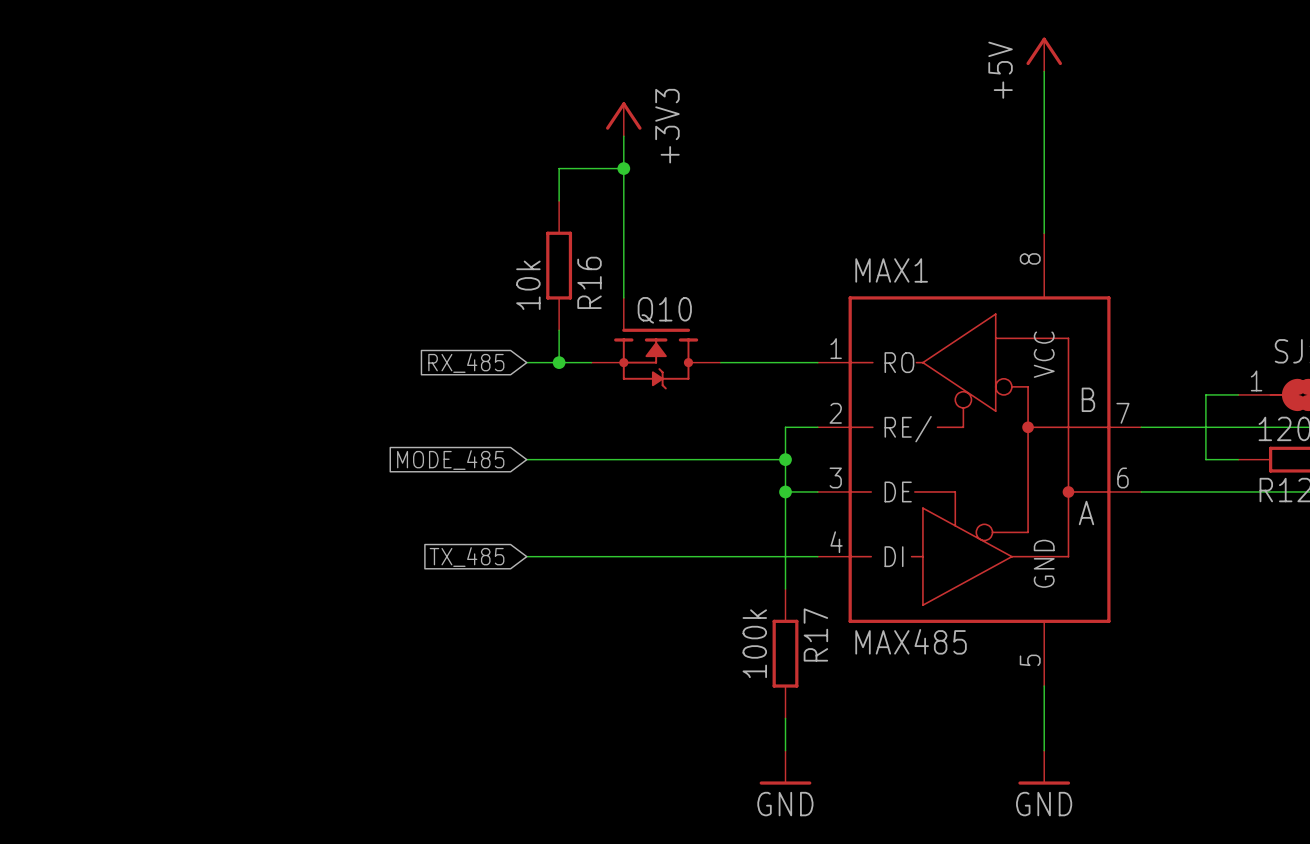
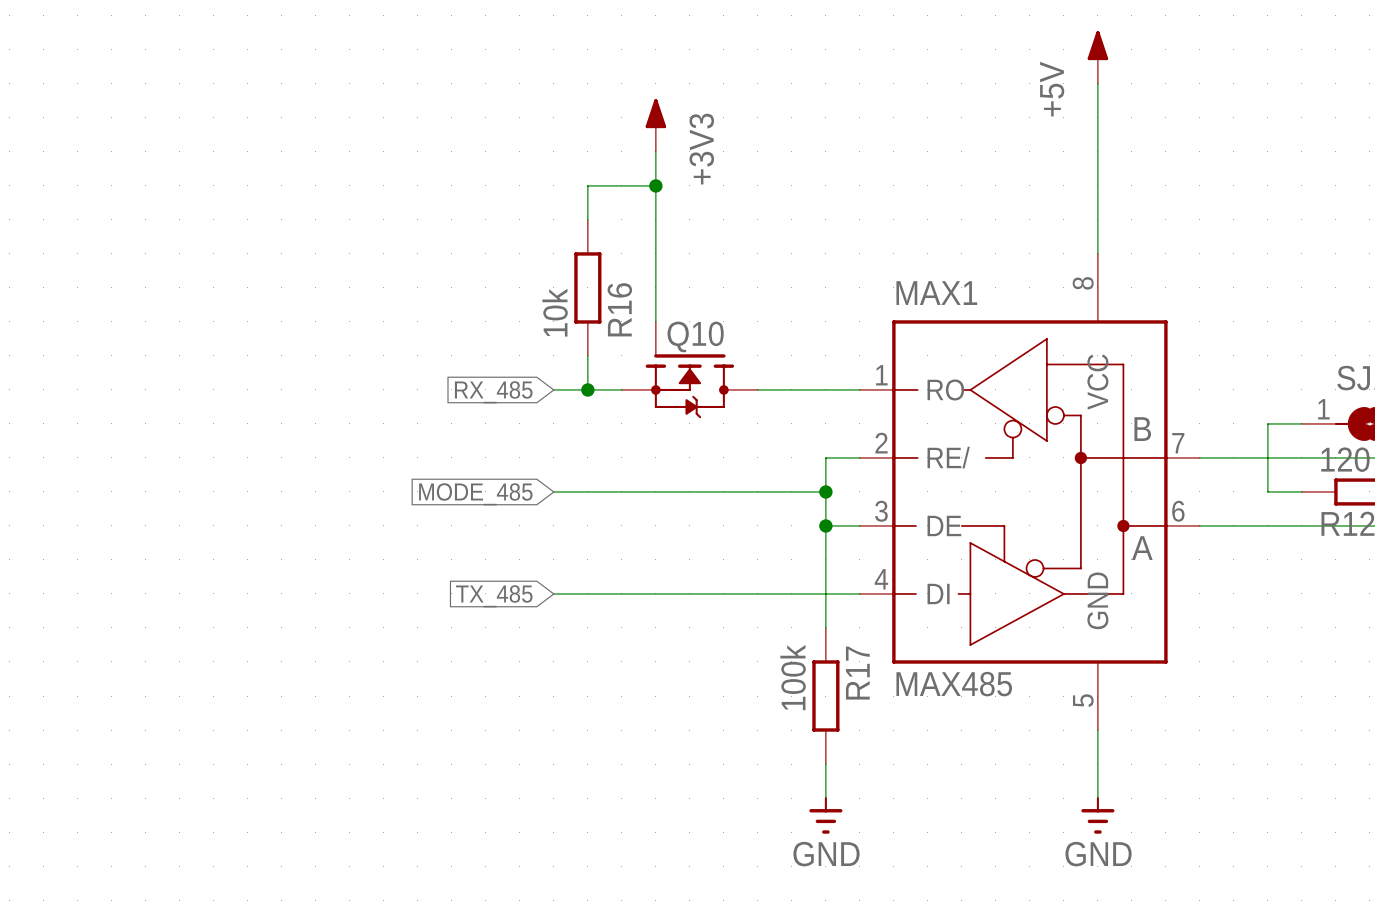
power symbol shape: [1026, 37, 1063, 72] -> [1087, 31, 1109, 84]
power symbol shape: [606, 102, 642, 137] -> [645, 99, 667, 152]
power symbol shape: [759, 750, 812, 785] -> [809, 796, 843, 834]
power symbol shape: [1018, 750, 1071, 785] -> [1081, 796, 1115, 834]

